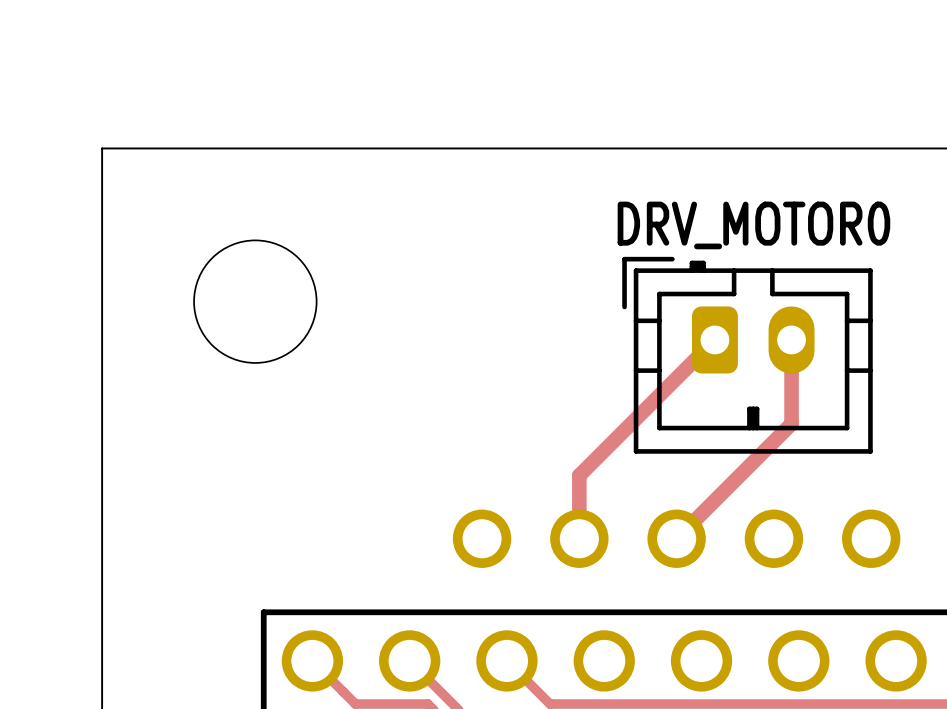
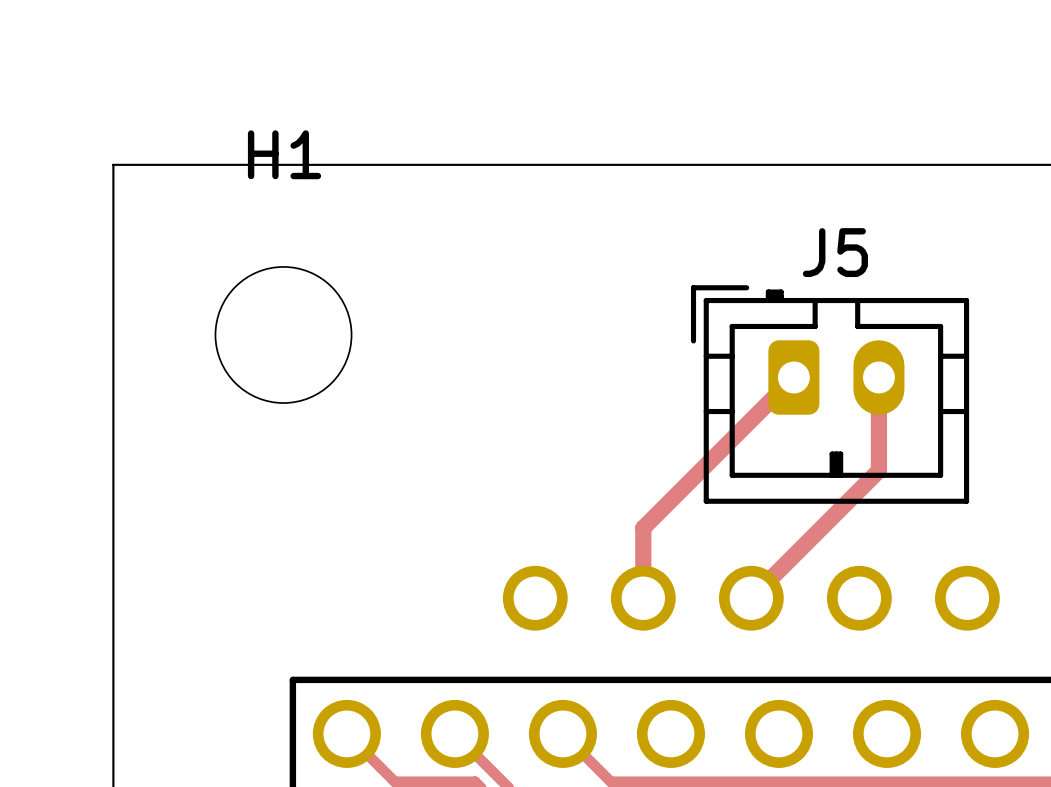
H1 name: none -> H1 (284, 154)
J5 value: DRV_MOTOR0 (753, 225) -> none
J5 name: none -> J5 (835, 252)

